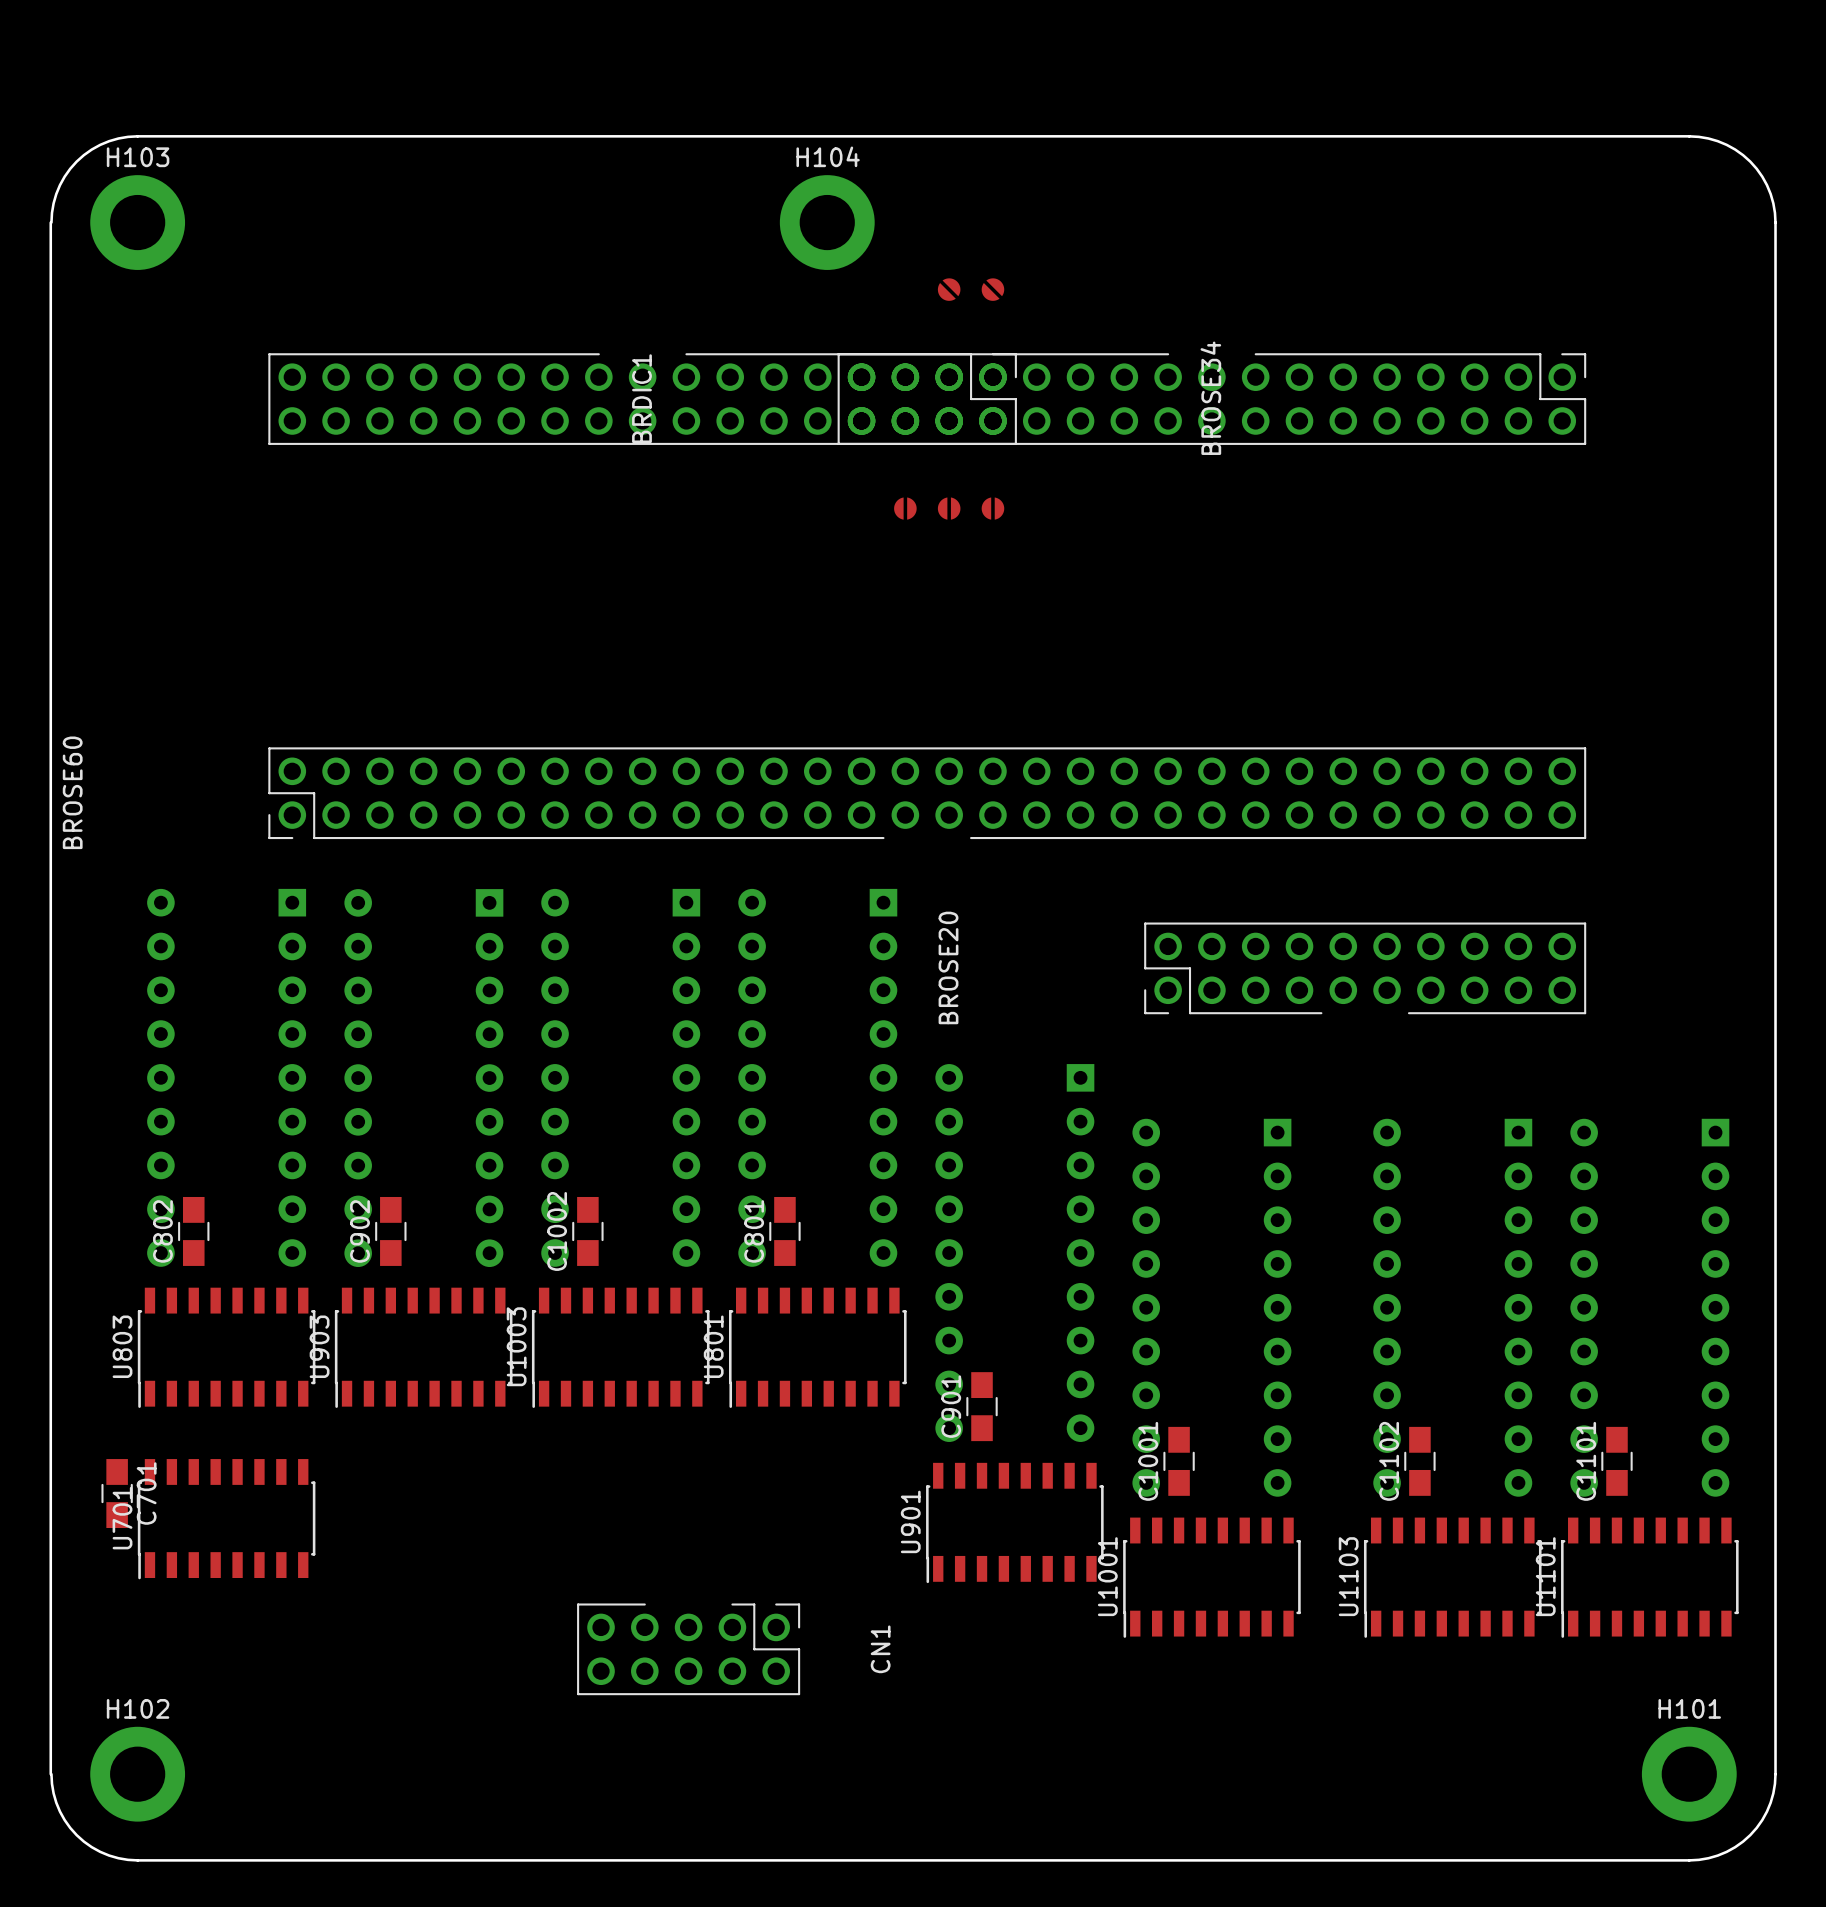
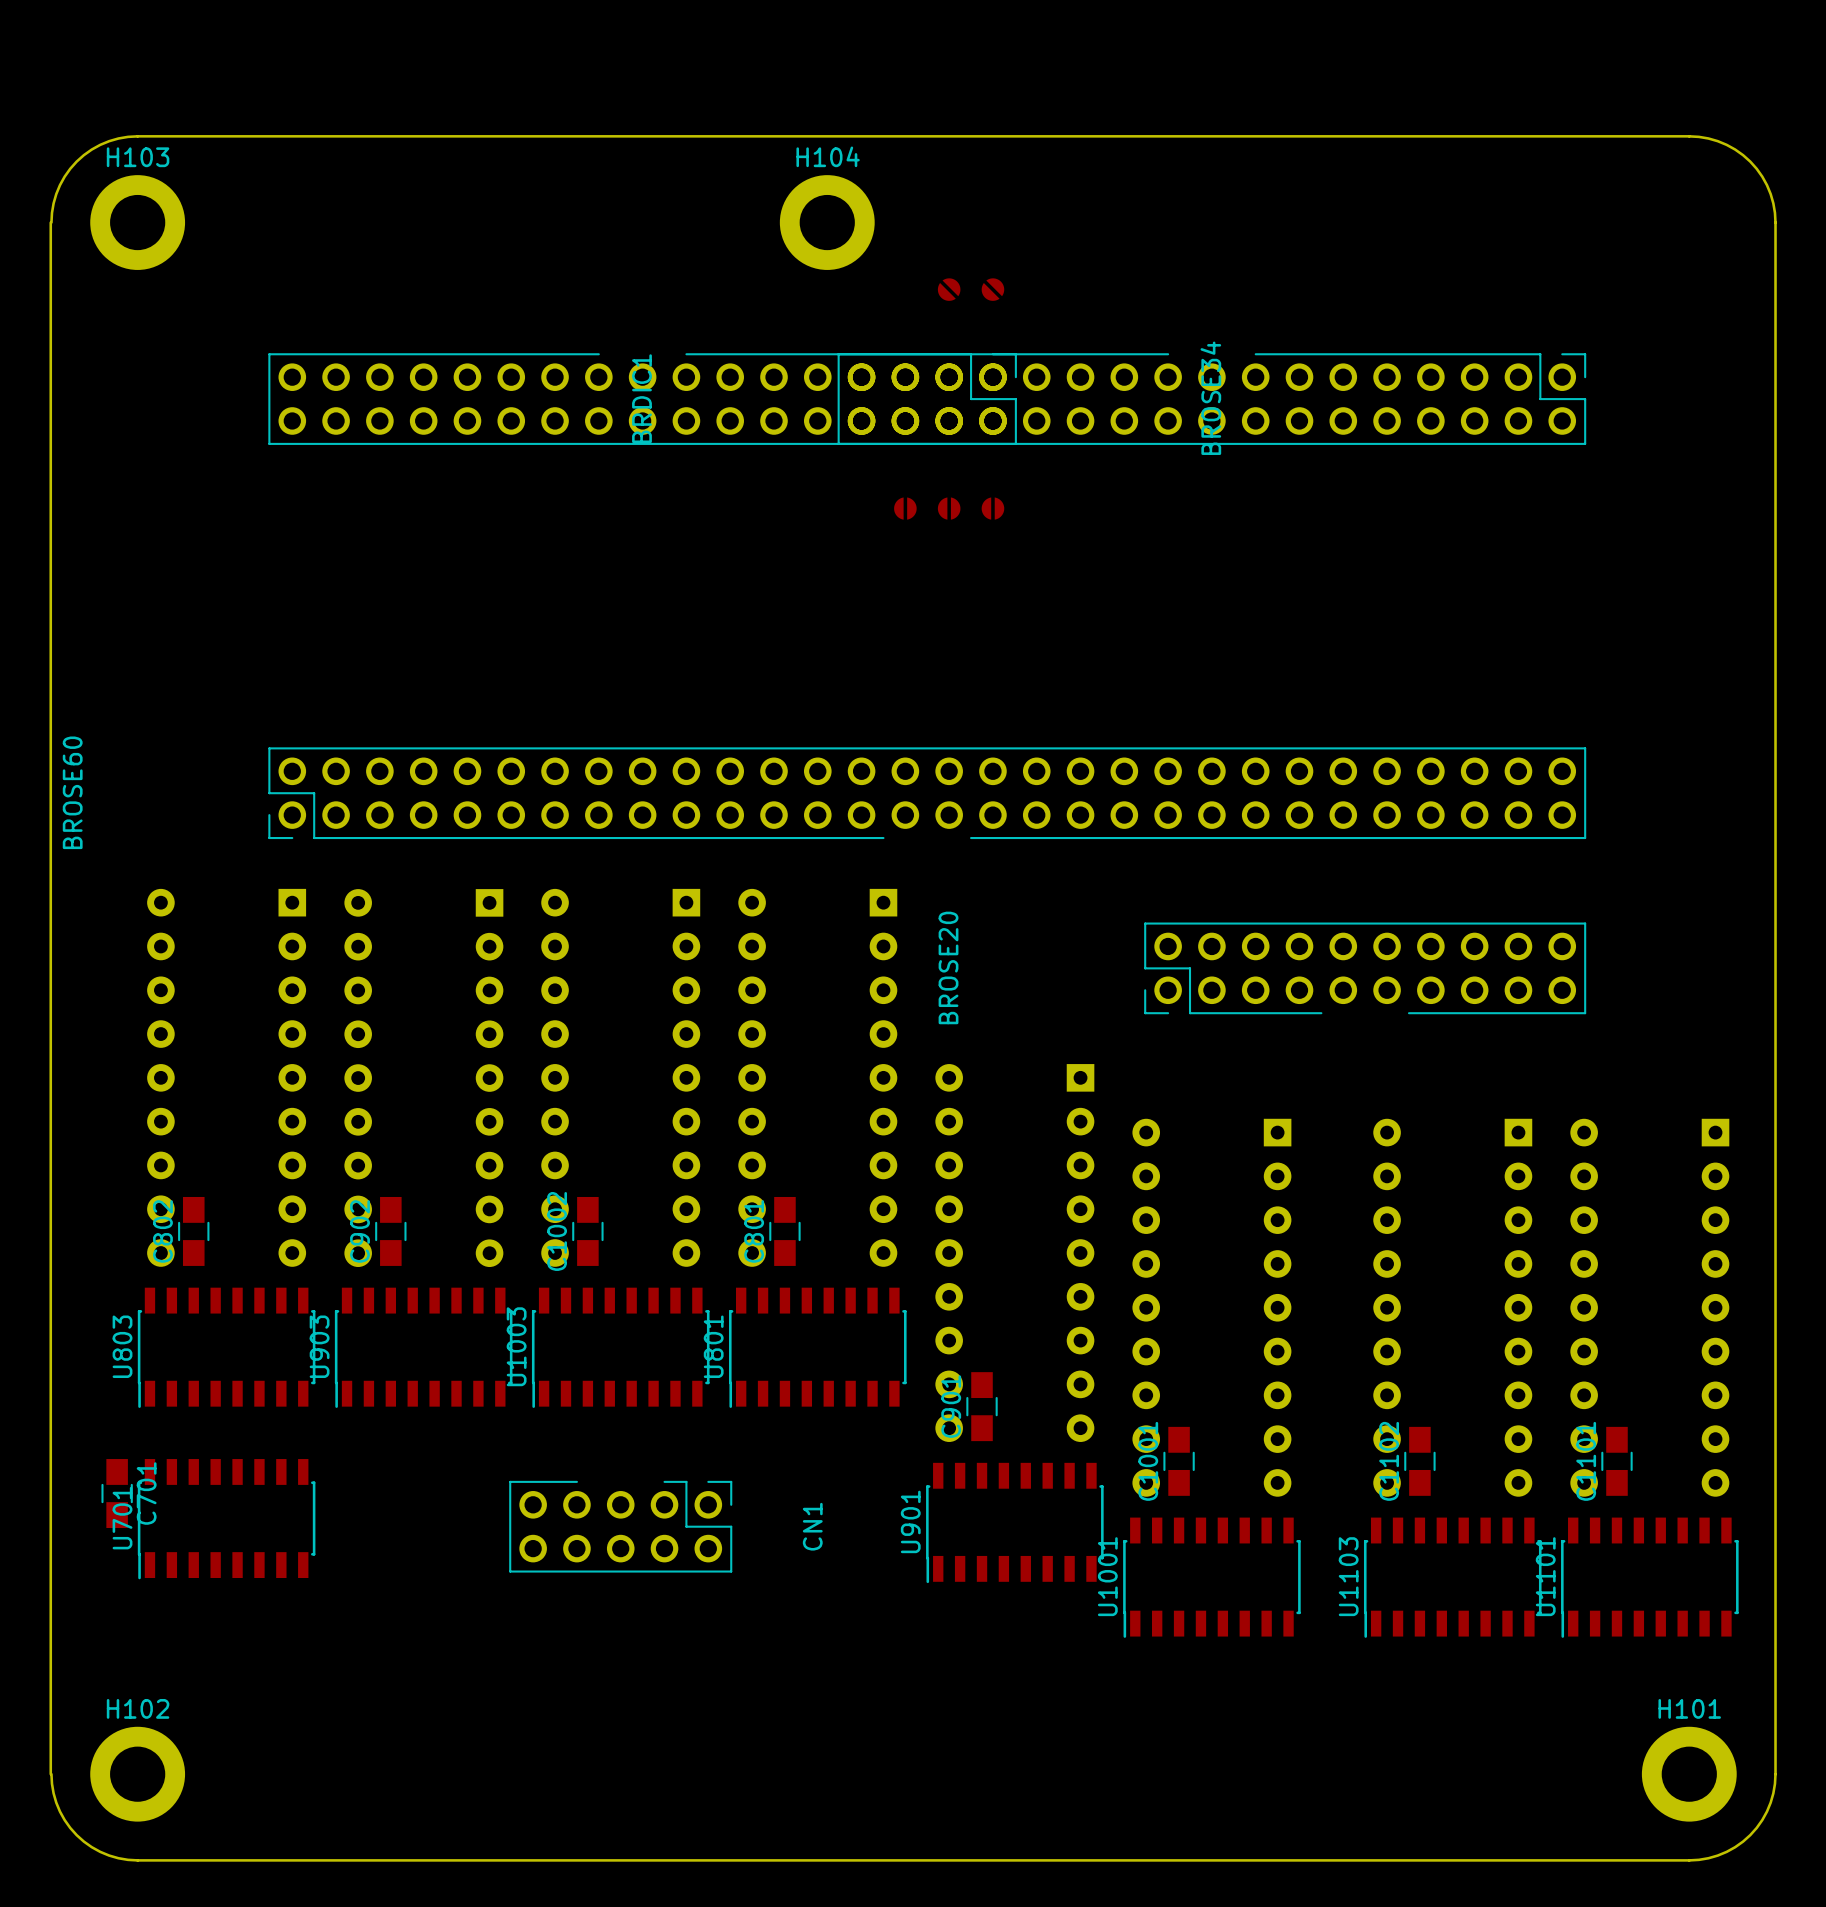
CN1 position: (688, 1649) -> (620, 1526)

